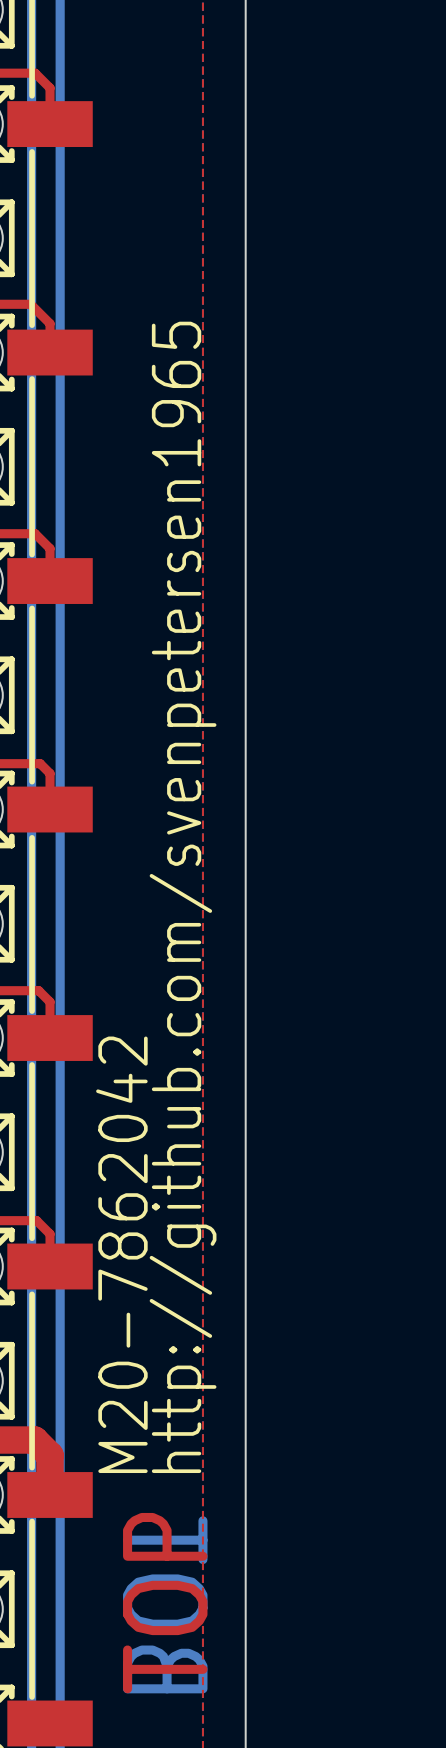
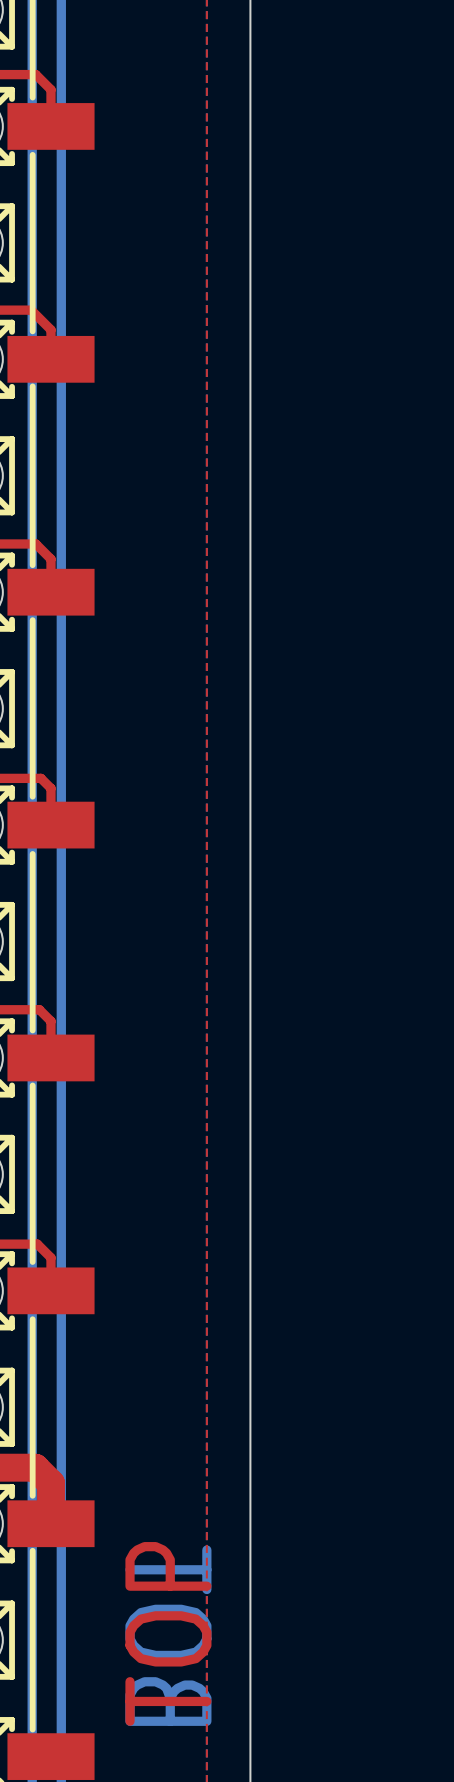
text: http://github.com/svenpetersen1965 (183, 897) -> none
text: M20-7862042 (121, 1254) -> none

